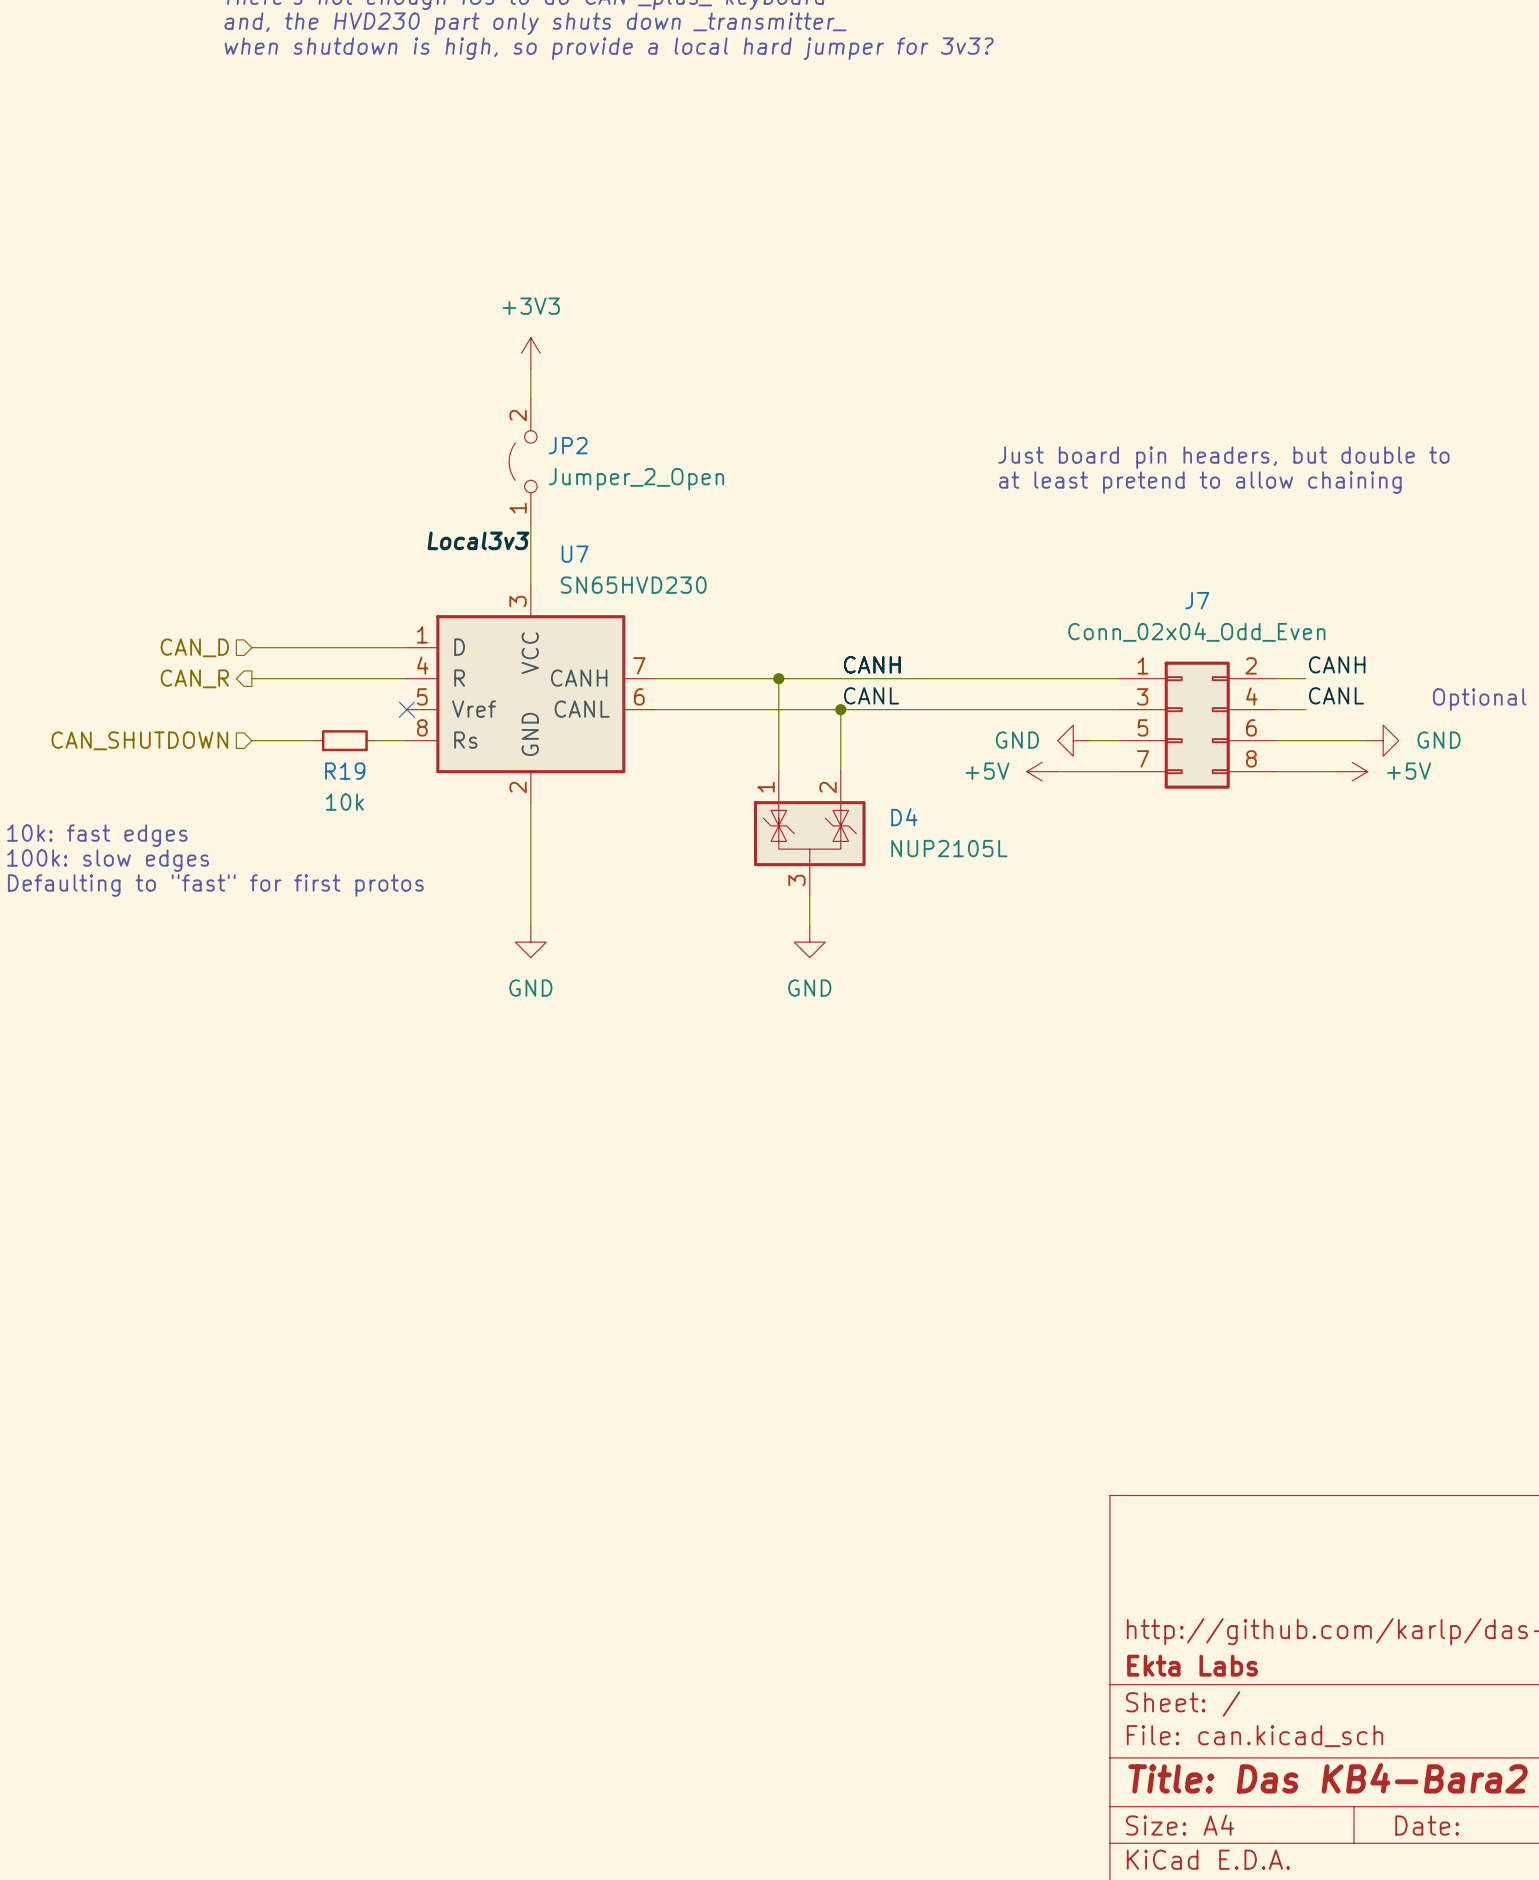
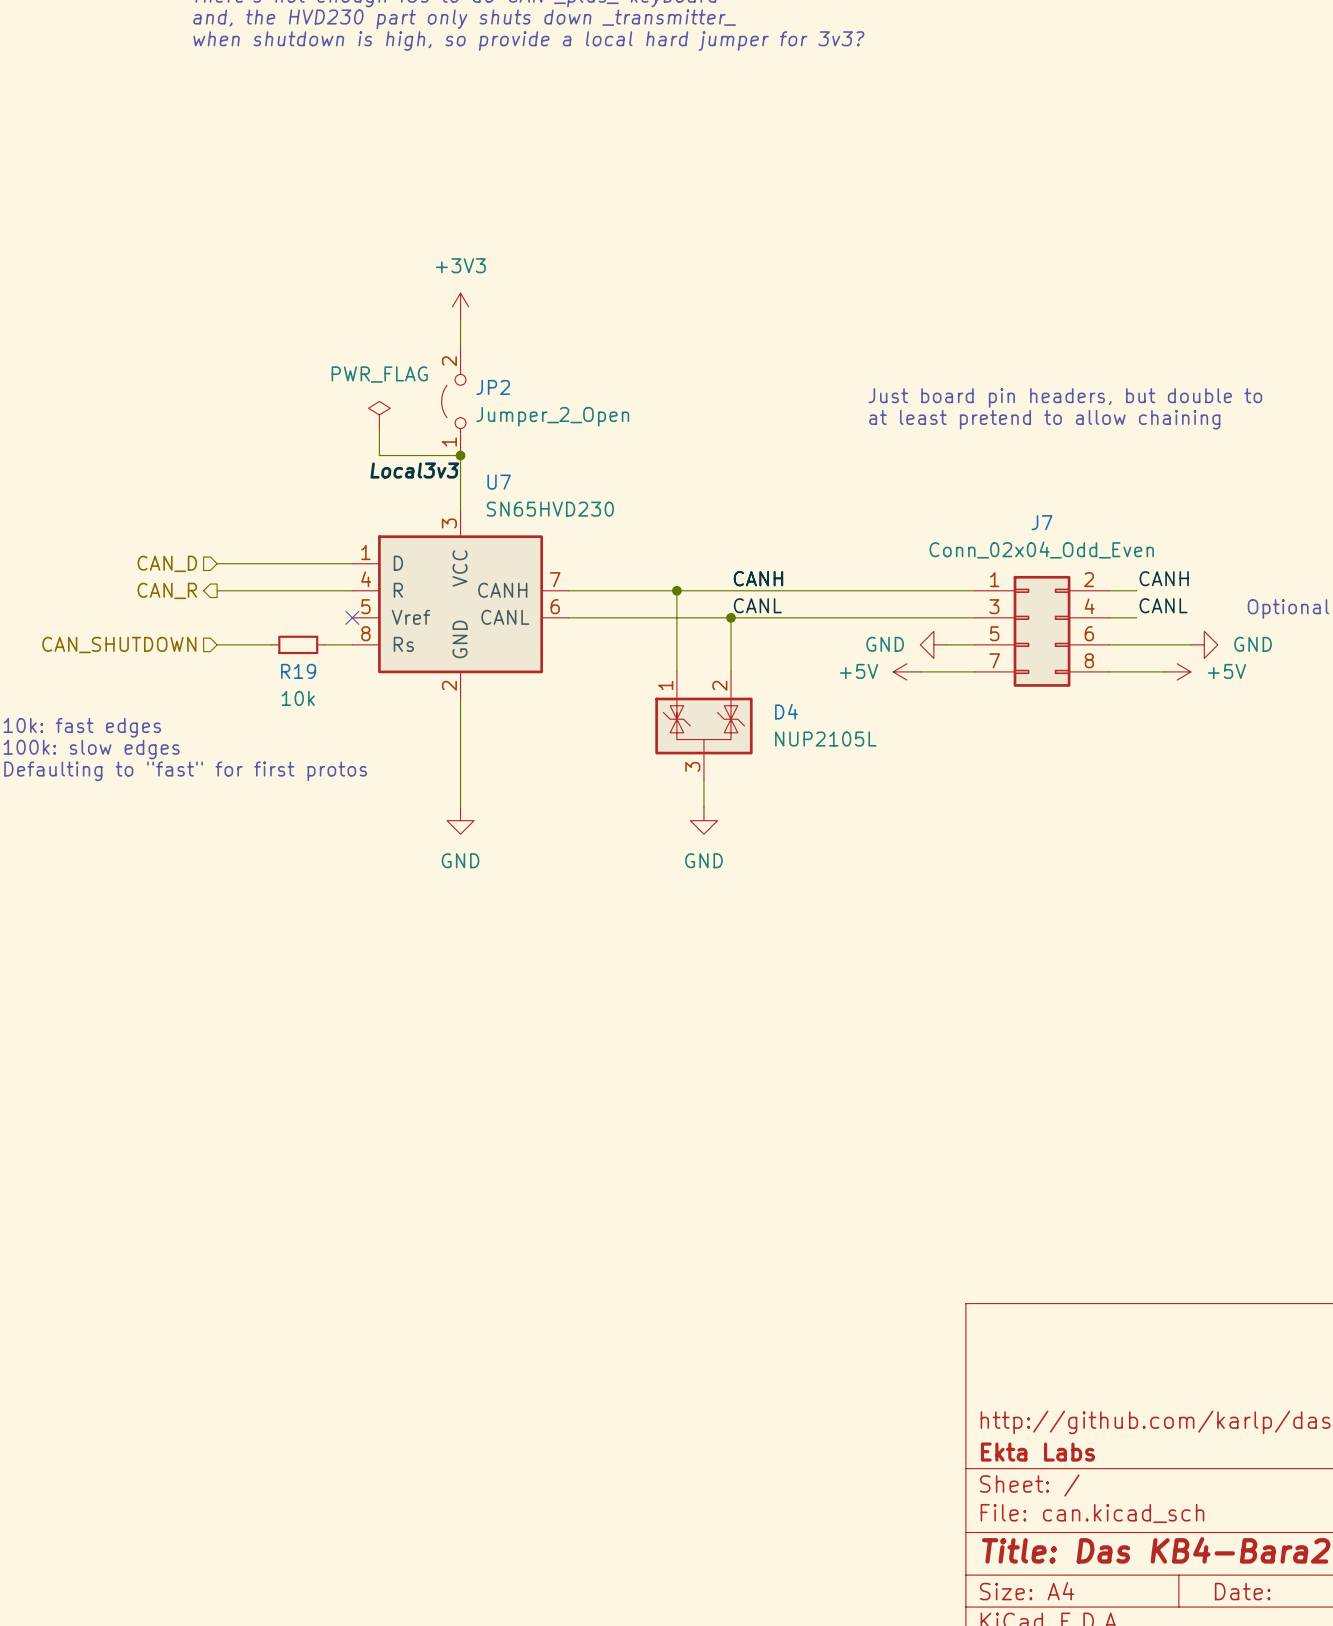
power symbol: none -> PWR_FLAG (379, 414)
wire: none -> (379, 428) (379, 455) (460, 455)
junction: none -> (460, 455)

